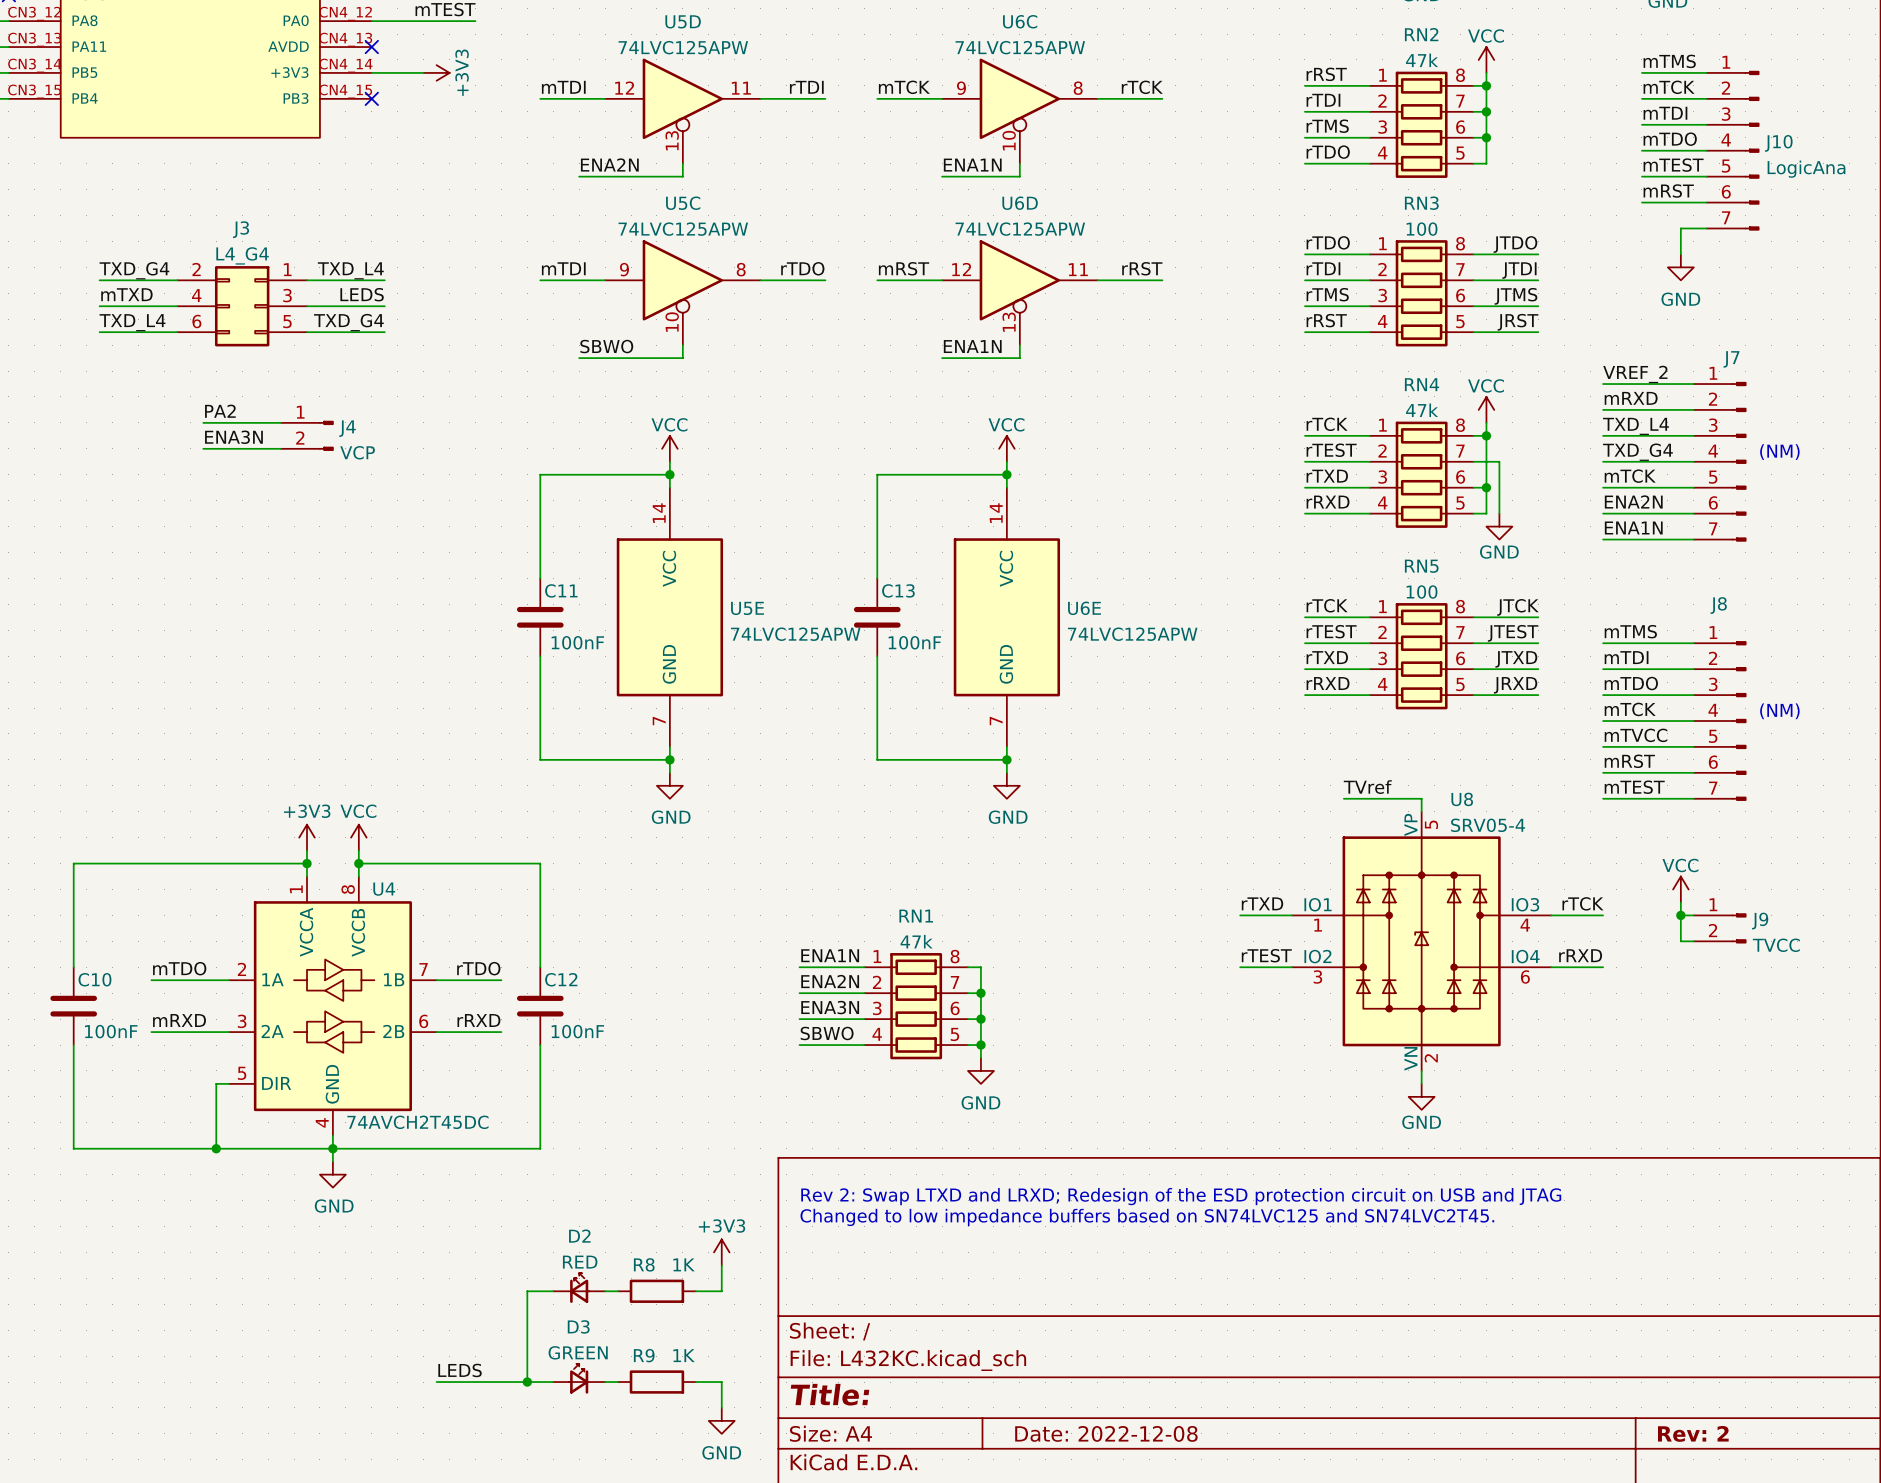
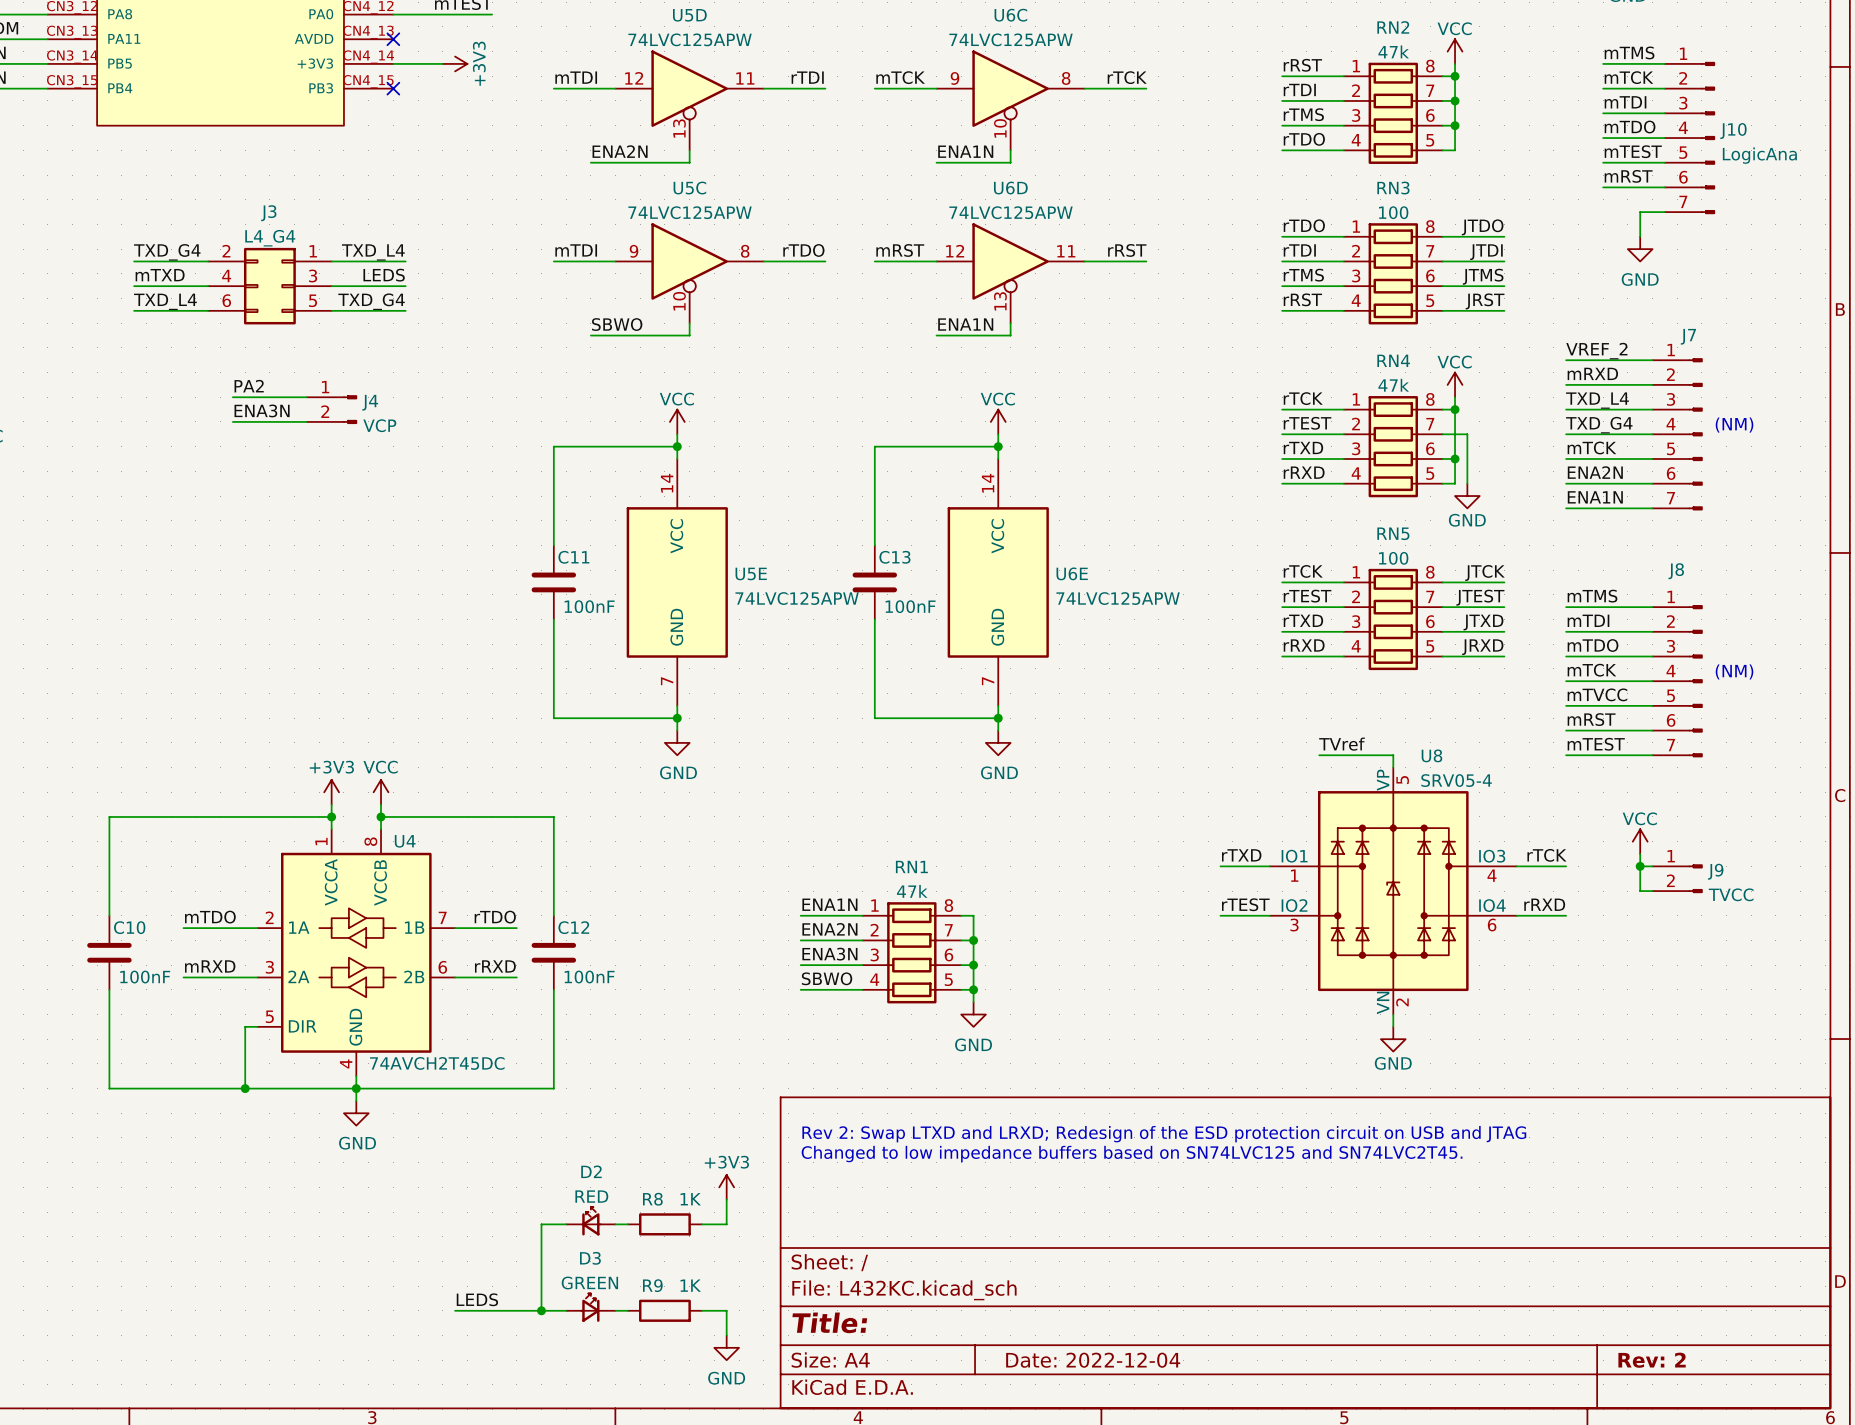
title block: Date: 2022-12-08 (1106, 1433) -> Date: 2022-12-04 (1093, 1360)

